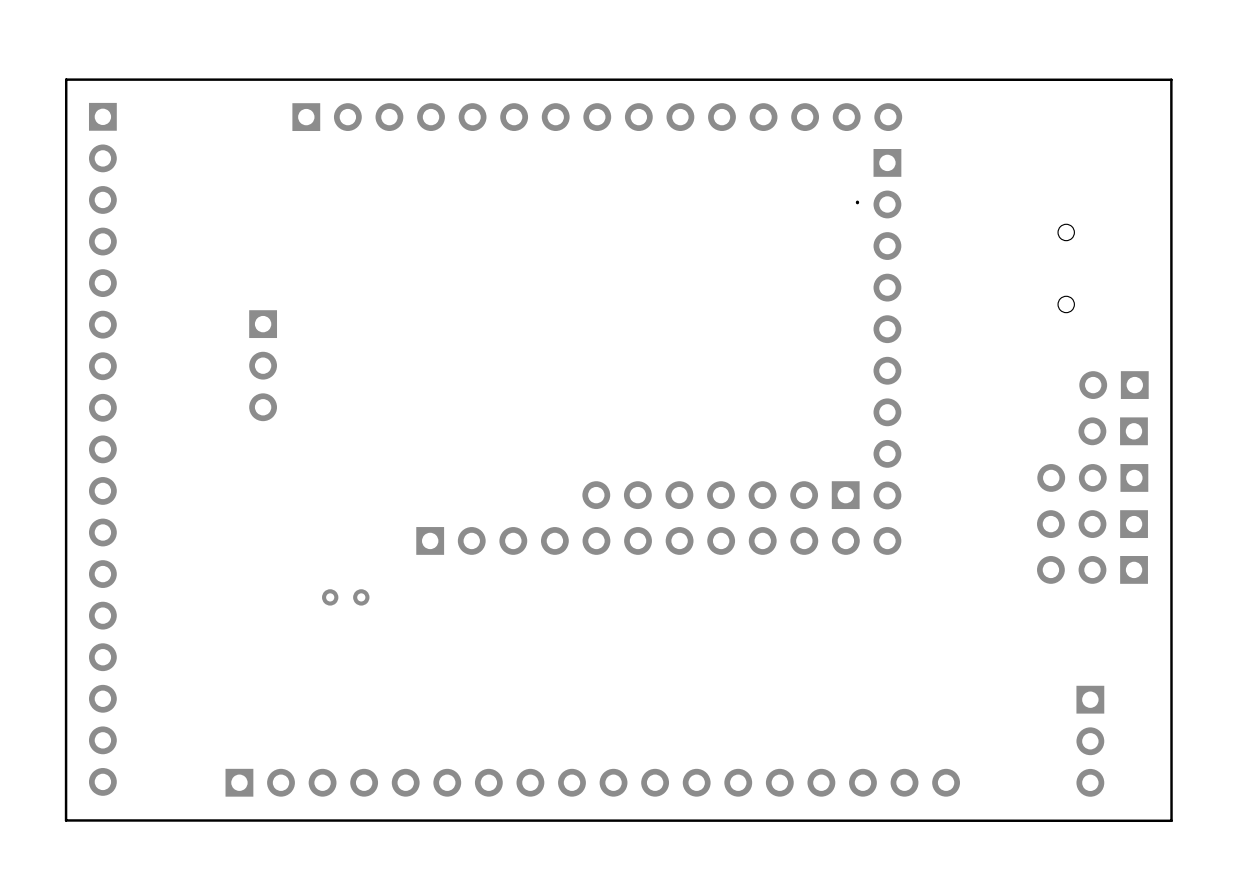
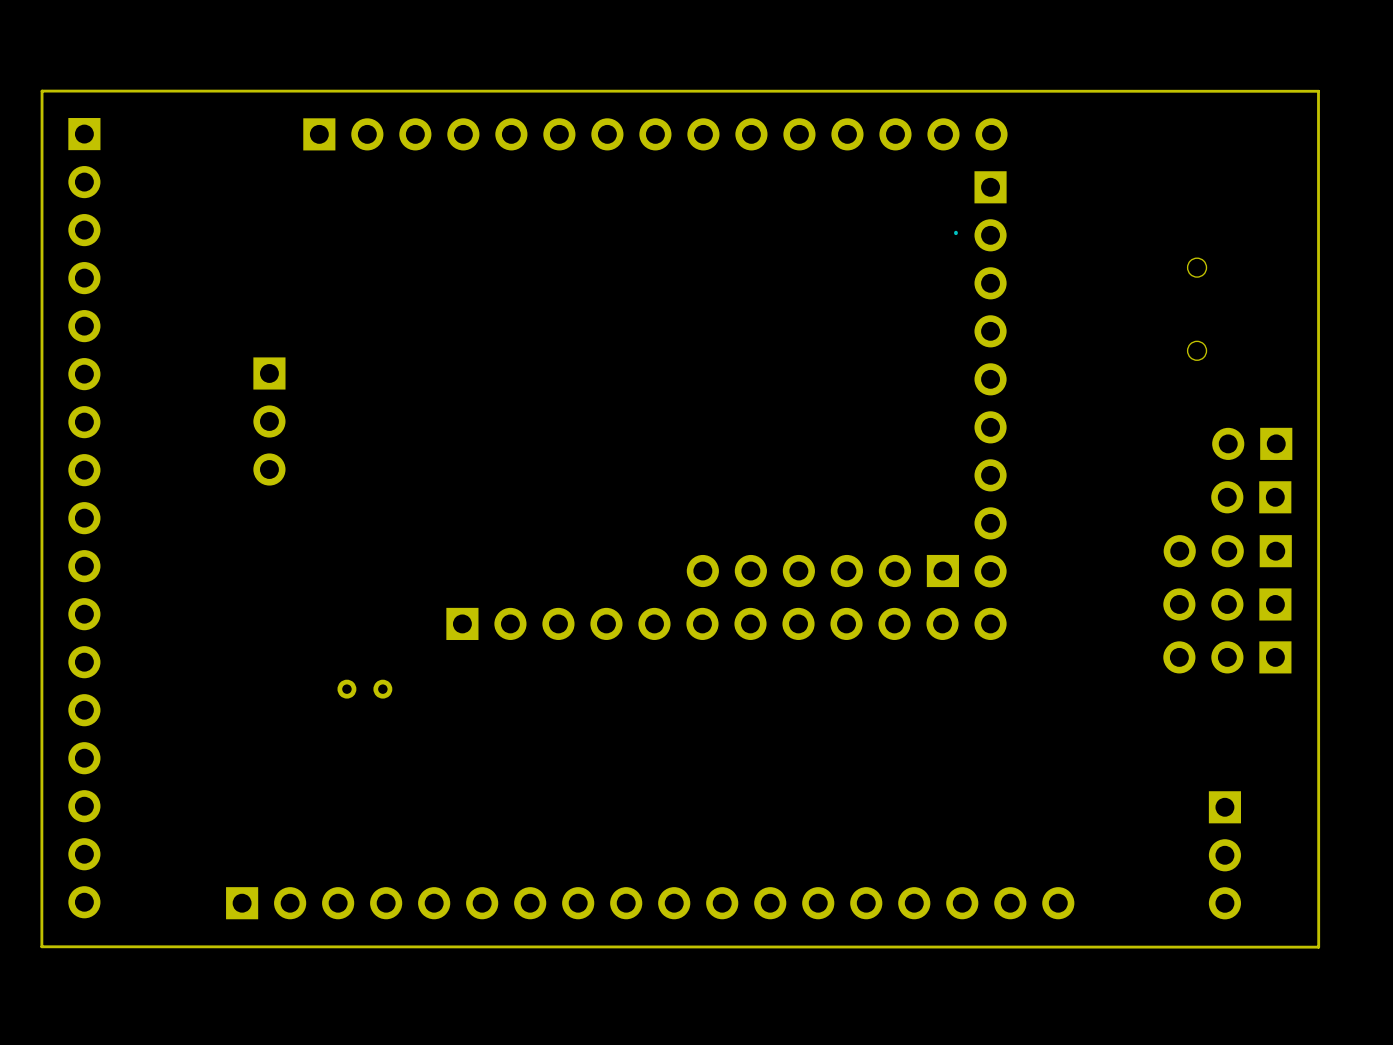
part: (720, 495) -> none
part: none -> (822, 571)

